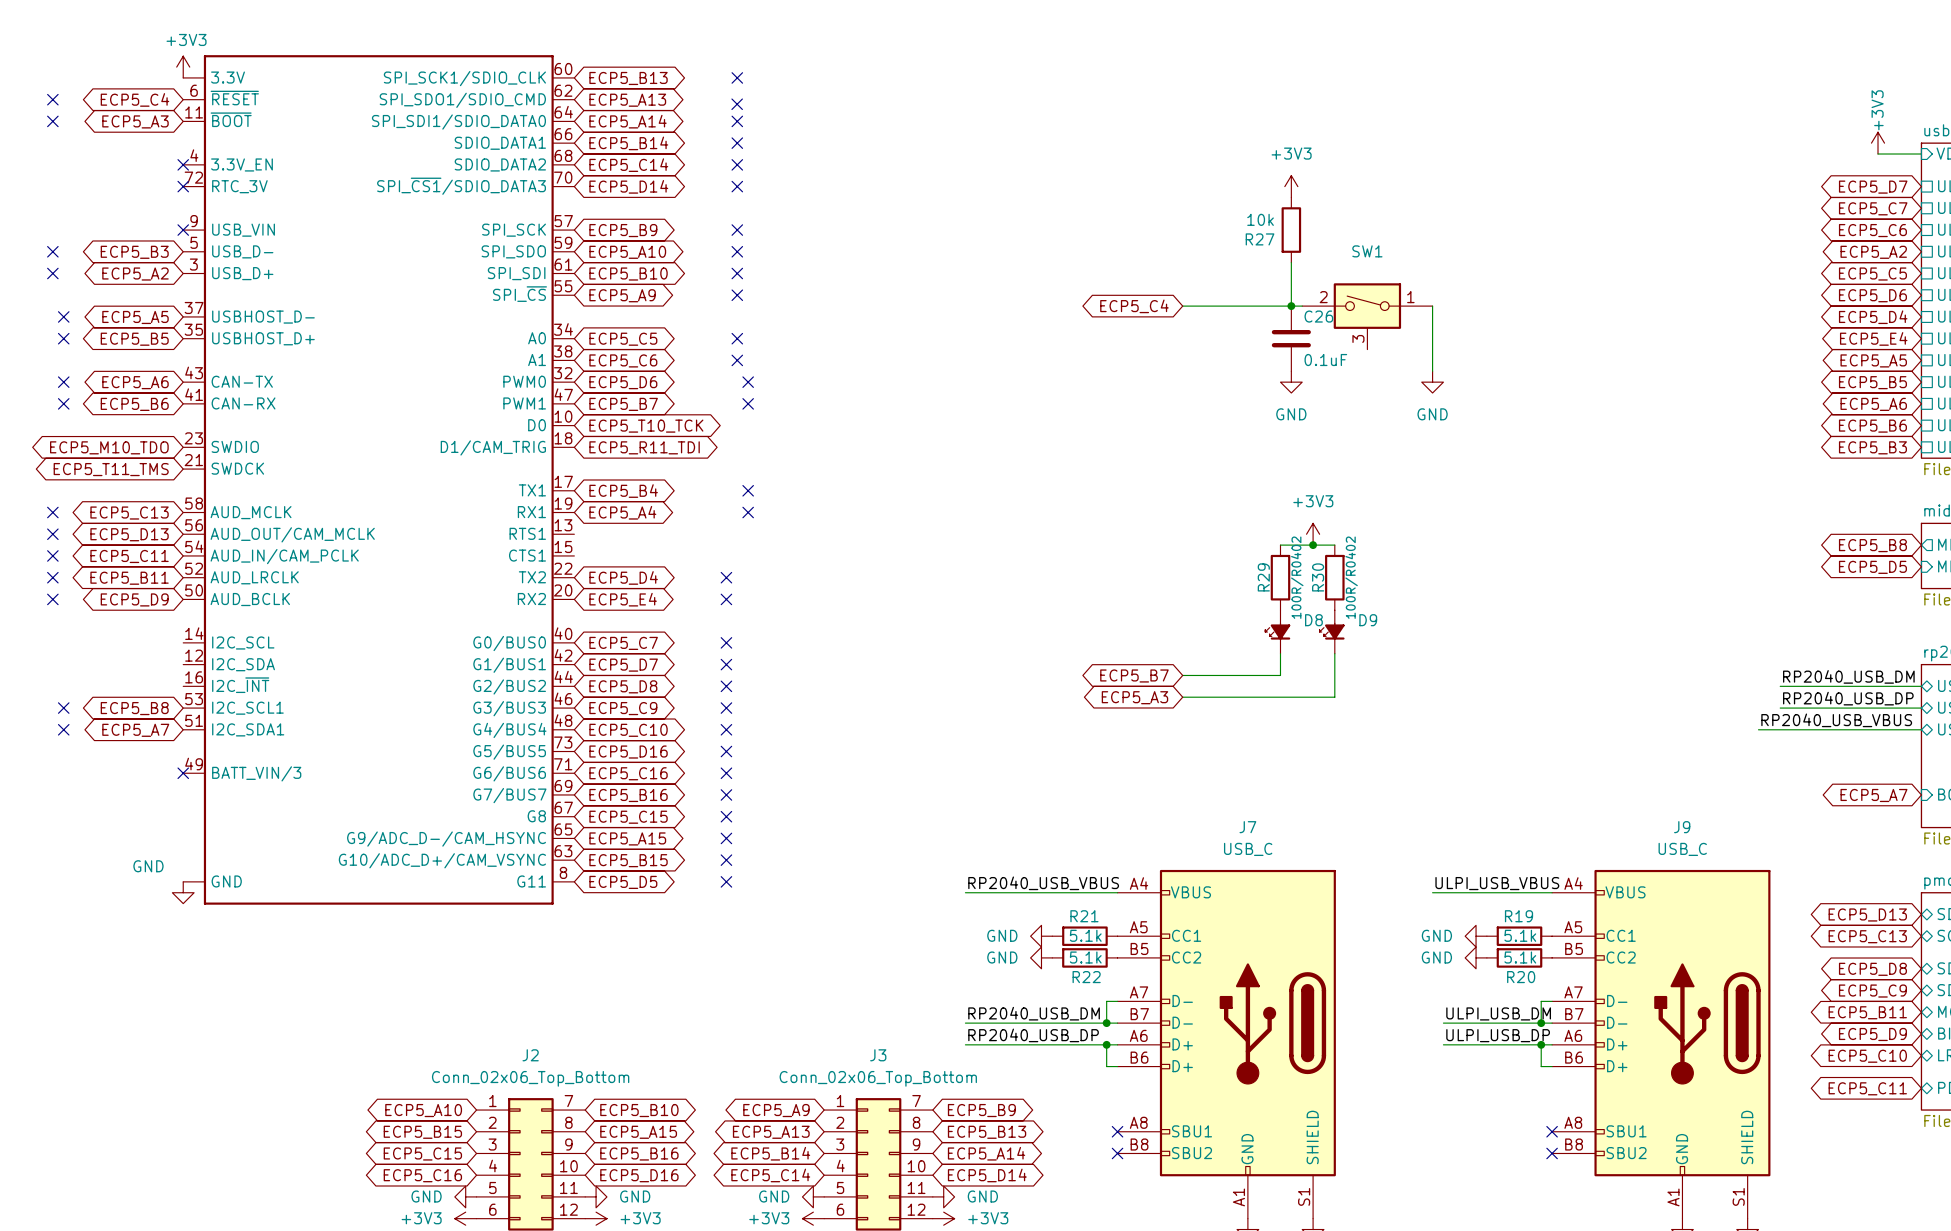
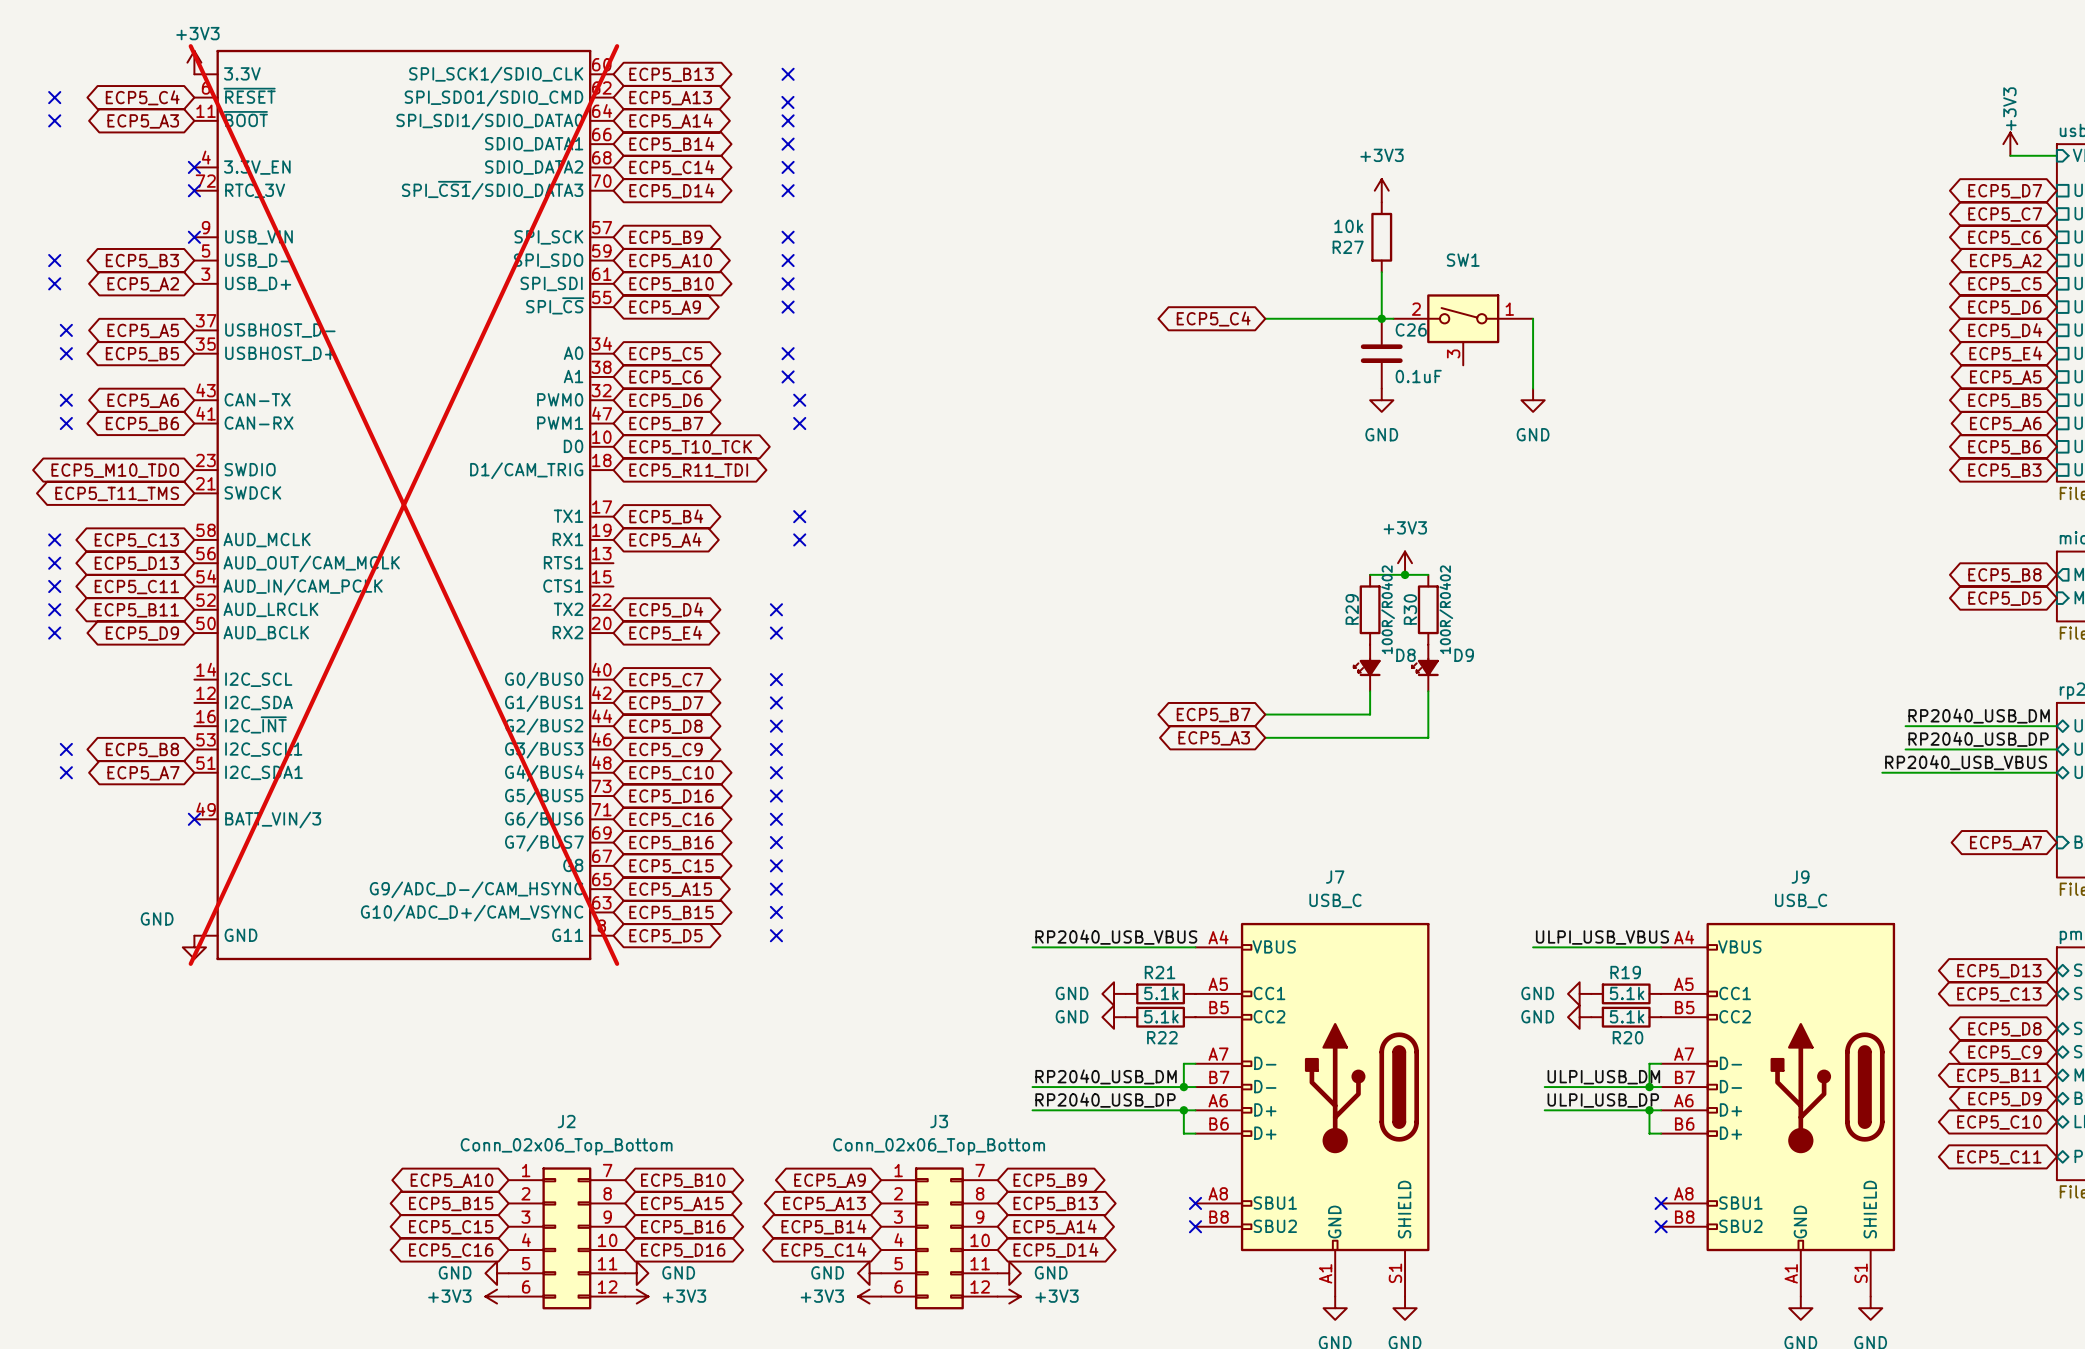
part do-not-place cross: none -> (403, 505)

